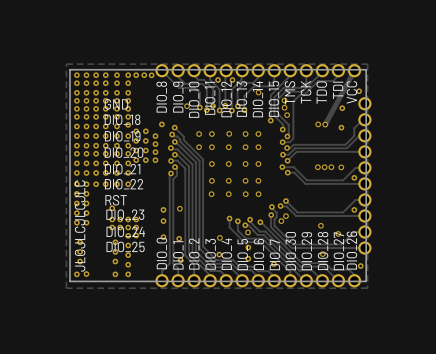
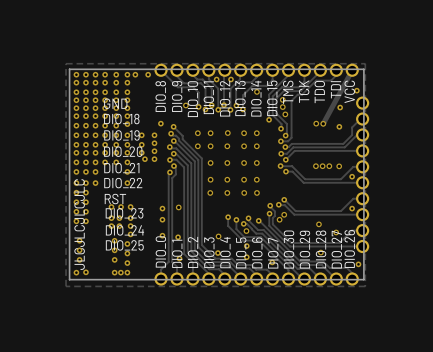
via: (144, 75) -> none
via: none -> (148, 74)
via: (151, 75) -> none
via: (136, 131) -> none
via: (145, 131) -> none
via: none -> (141, 135)
via: (136, 140) -> none
via: (145, 140) -> none
via: none -> (141, 144)
via: (136, 150) -> none
via: (145, 150) -> none
via: none -> (141, 152)
via: (136, 160) -> none
via: (105, 173) -> none
via: (116, 173) -> none
via: (105, 184) -> none
via: (116, 184) -> none
via: none -> (121, 206)
via: none -> (130, 206)
via: (128, 219) -> none
via: none -> (130, 218)
via: (136, 219) -> none
via: (128, 227) -> none
via: none -> (130, 226)
via: (136, 227) -> none
via: (128, 235) -> none
via: none -> (130, 234)
via: (136, 235) -> none
via: none -> (120, 272)

